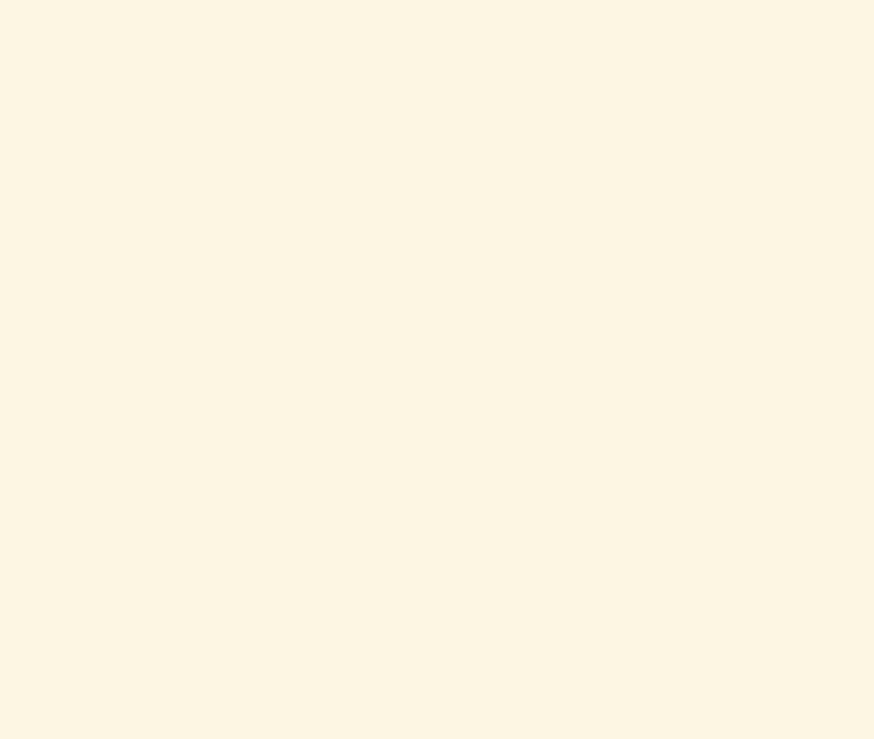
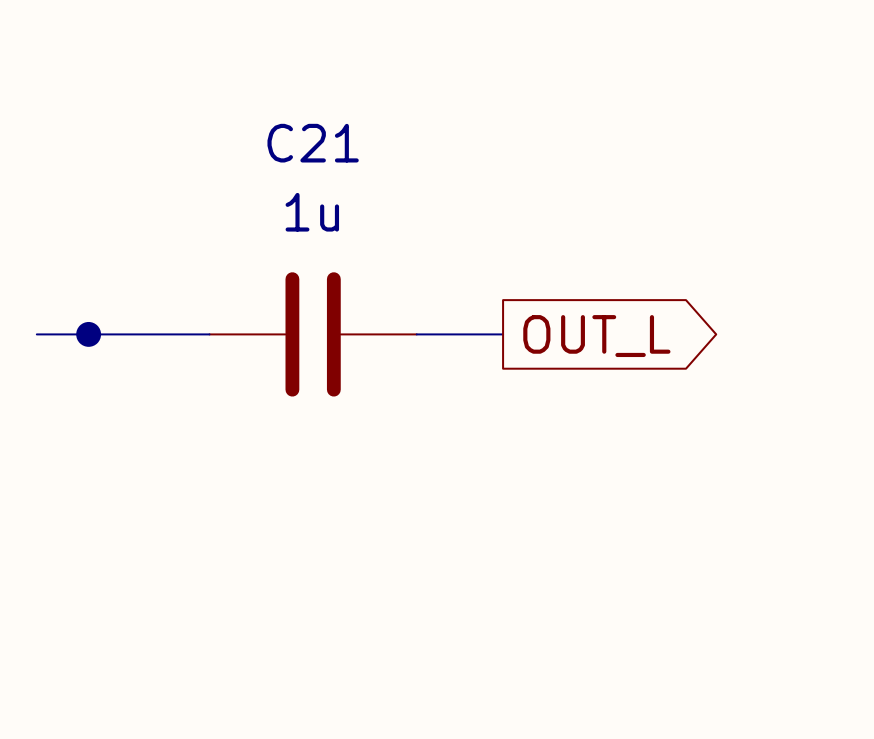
wire: none -> (36, 334) (209, 334)
junction: none -> (88, 334)
C21: none -> 1u (313, 334)
wire: none -> (416, 334) (503, 334)
global label: none -> OUT_L (596, 336)

